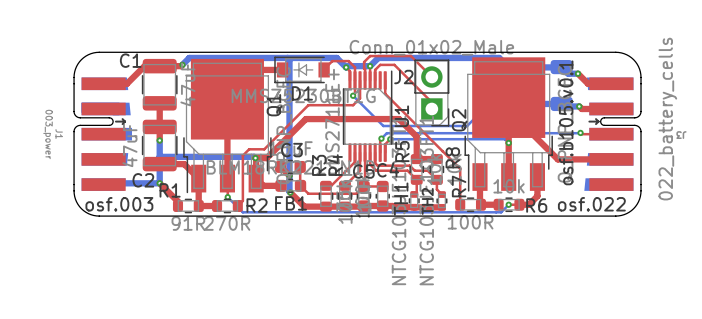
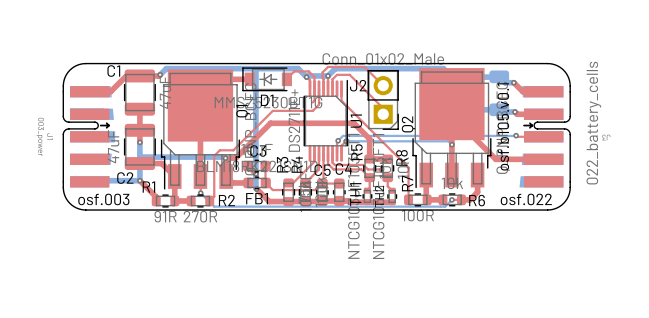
bottom track: (507, 85) (467, 125) (383, 125) (353, 95) -> none
via: (353, 95) -> none

